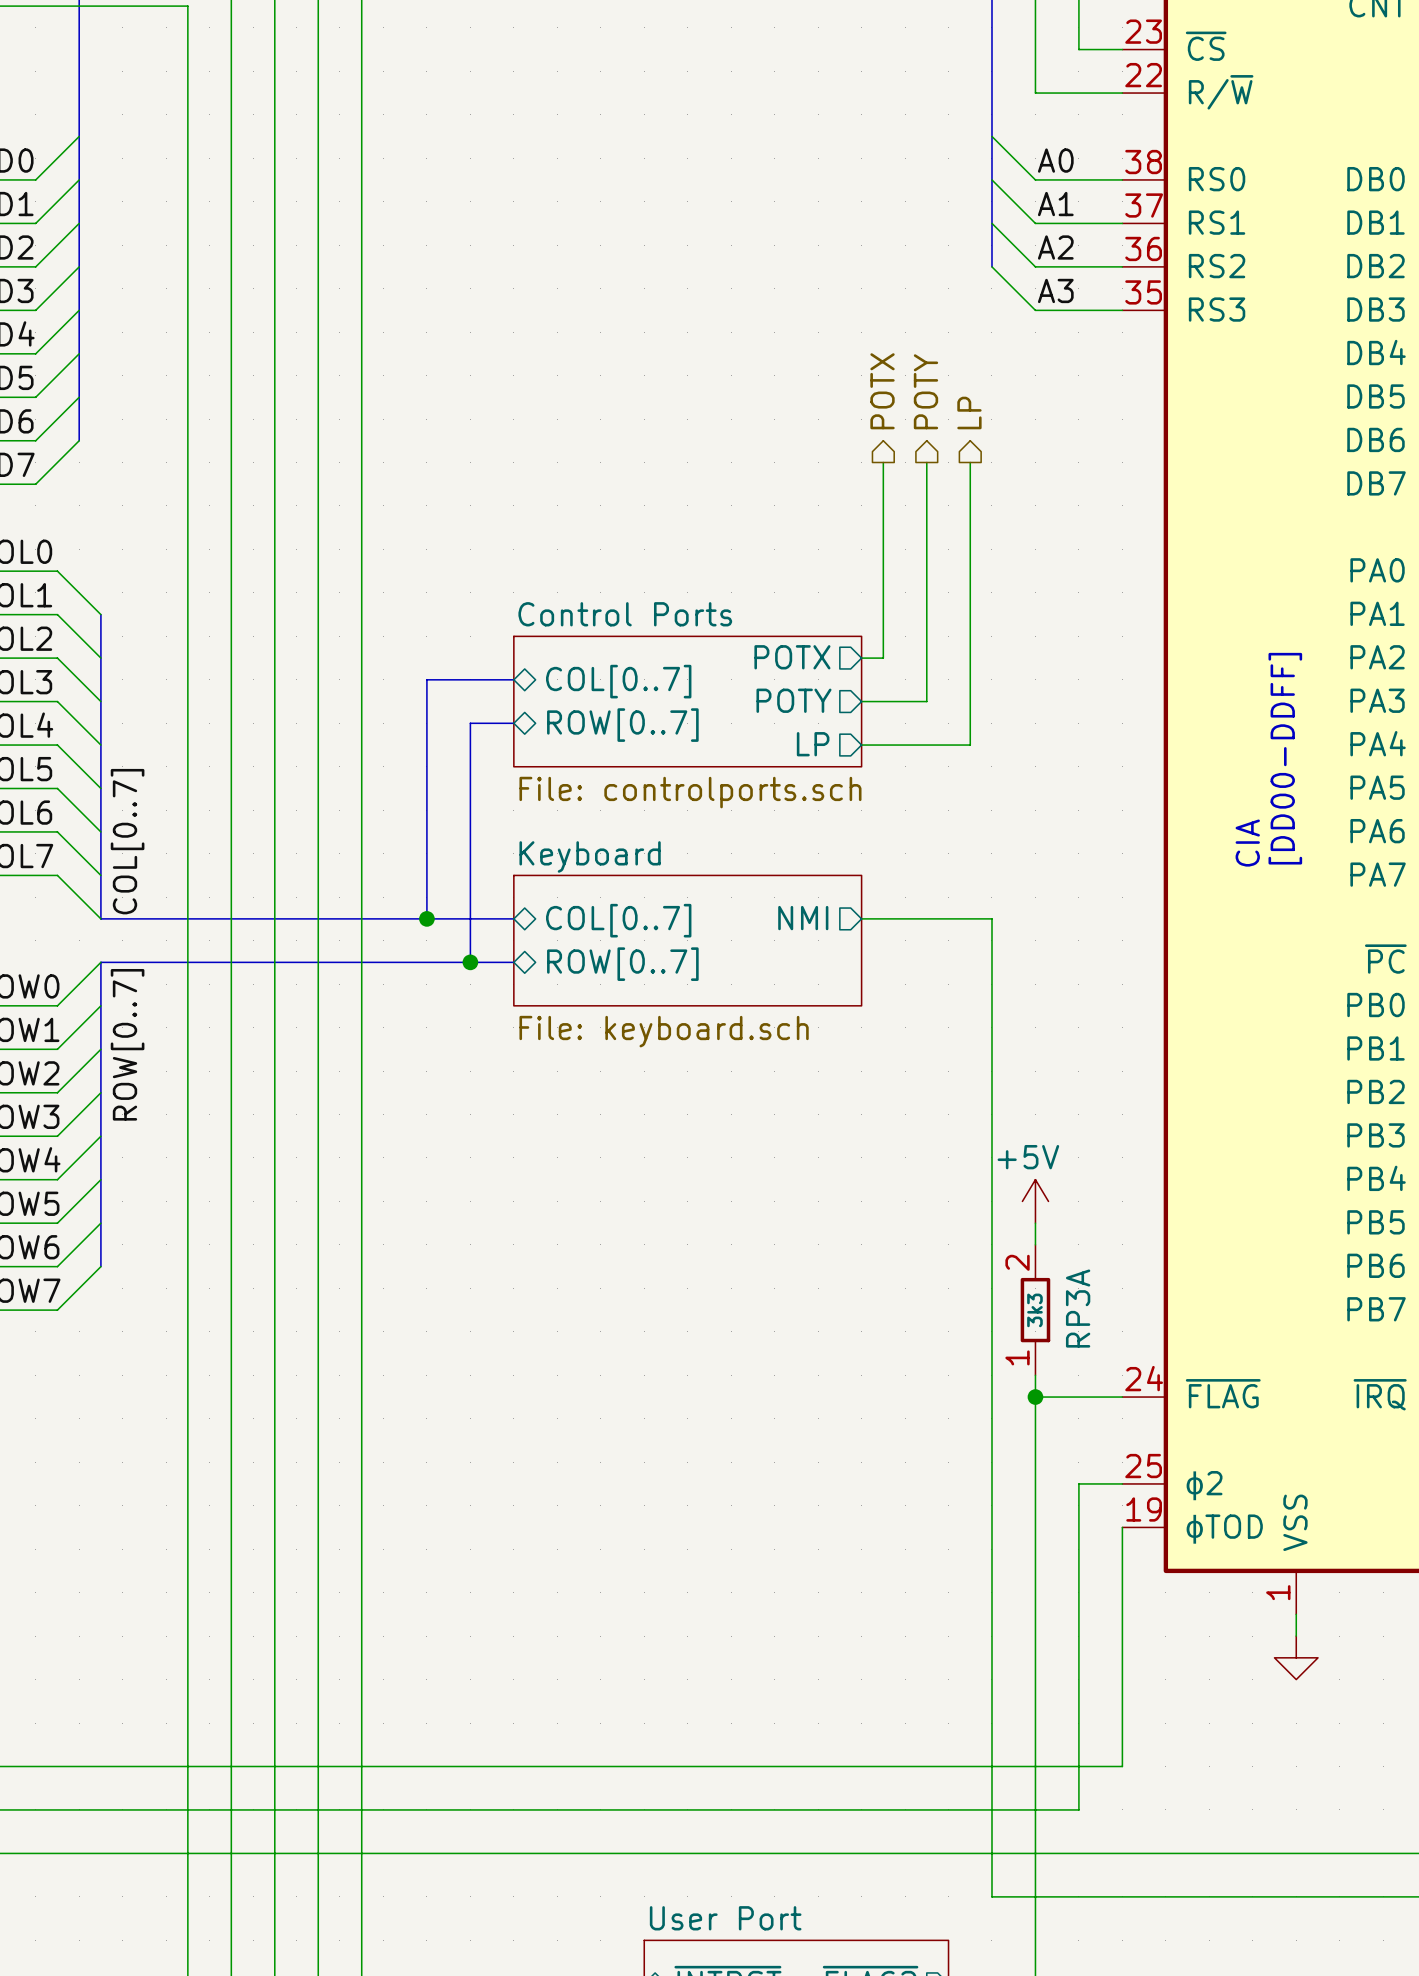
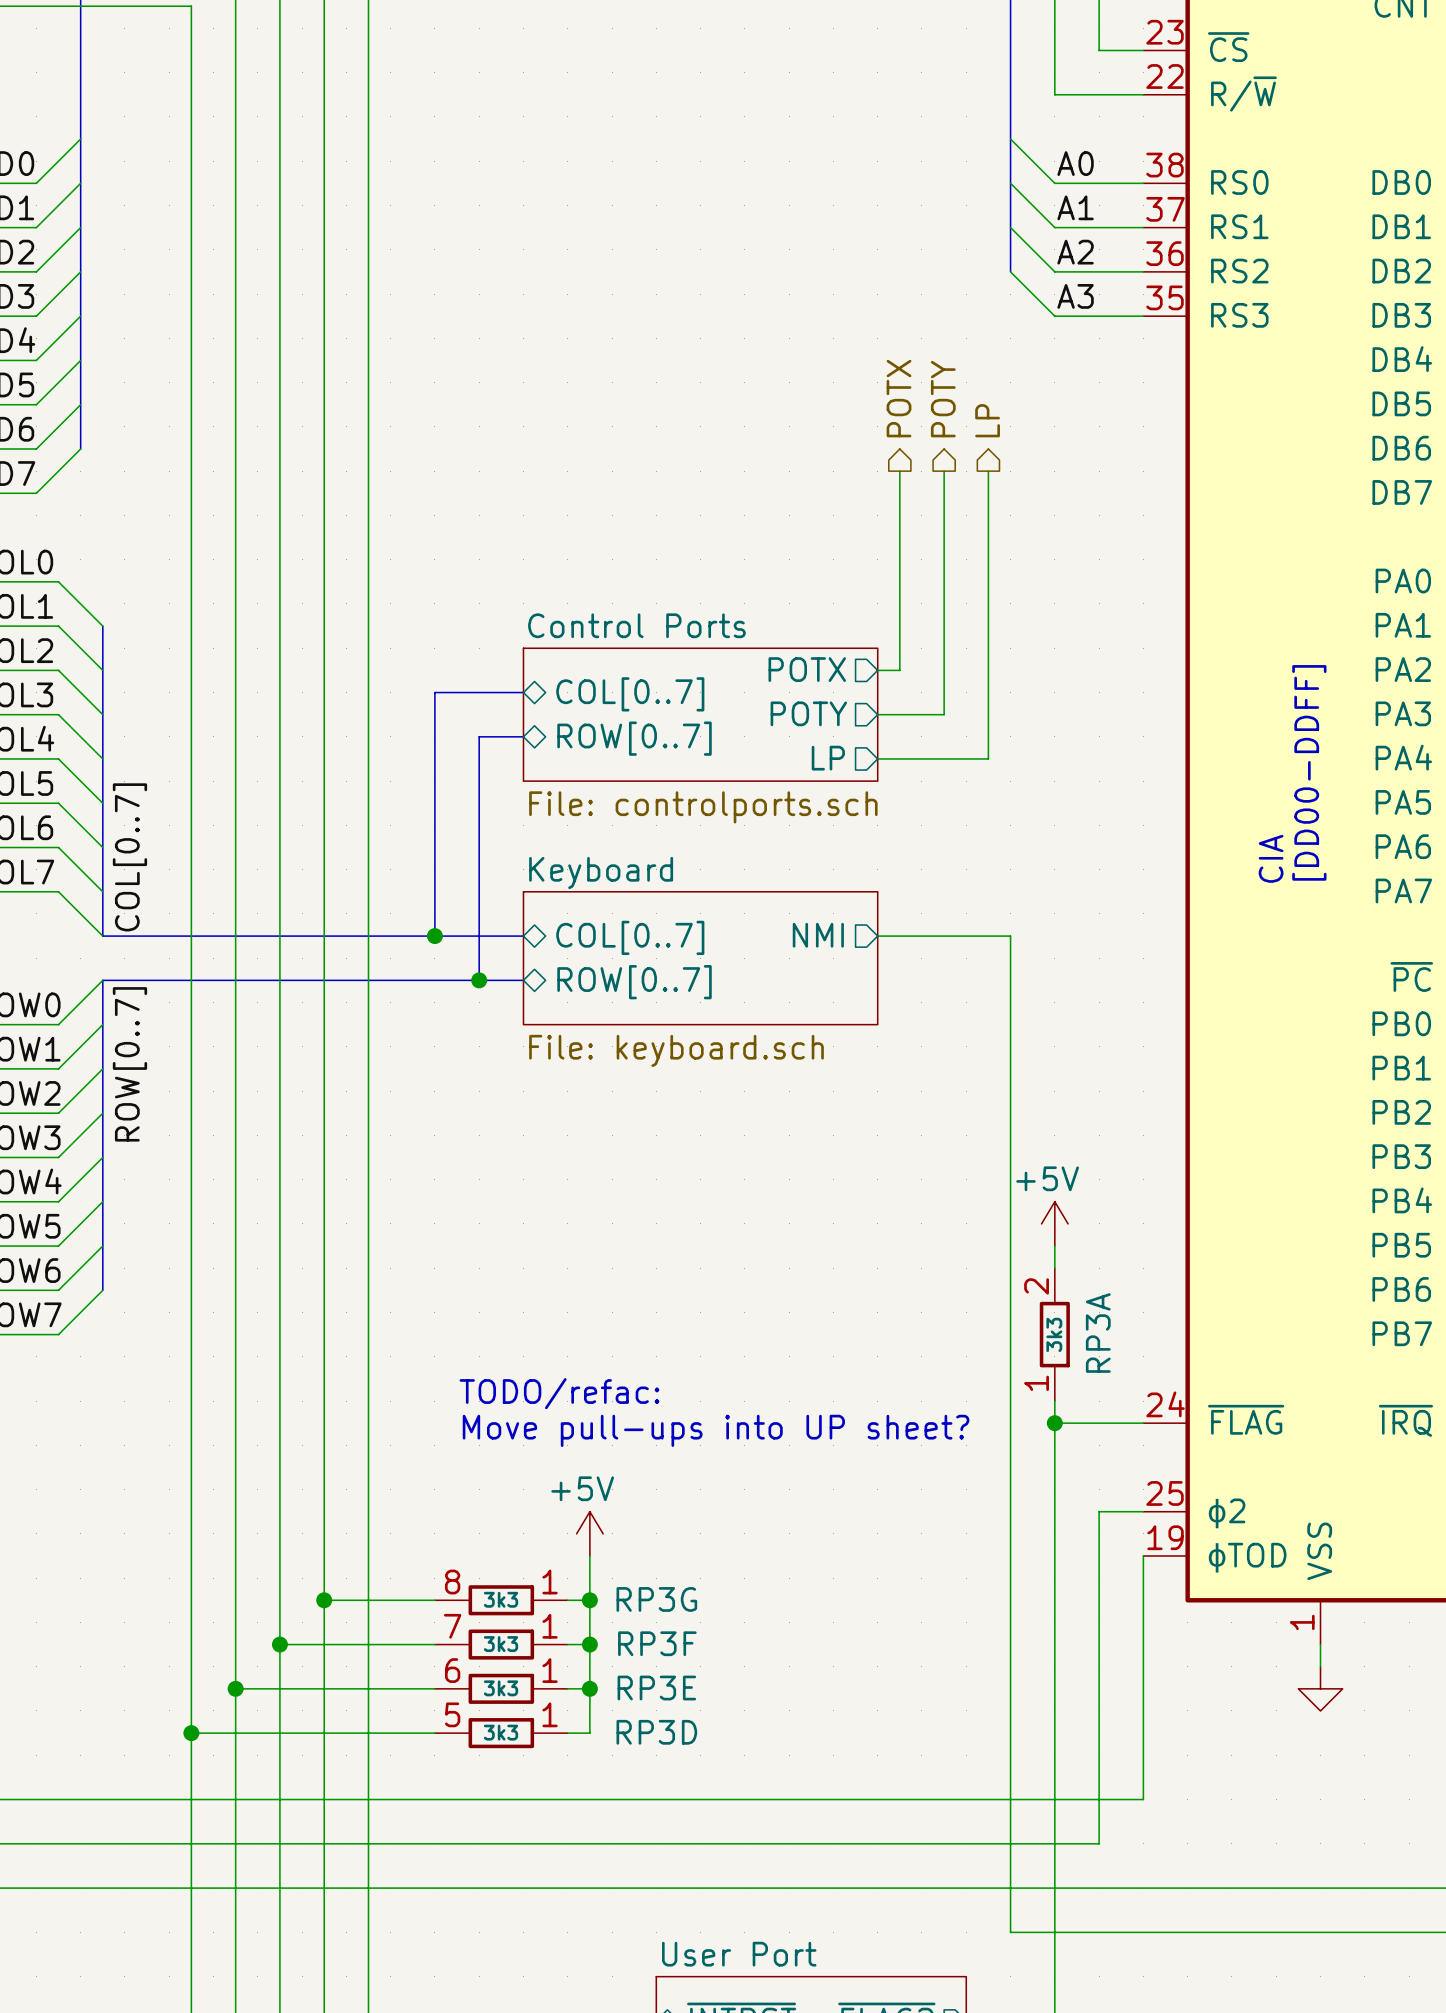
text: none -> TODO/refac: (559, 1393)
text: none -> Move pull-ups into UP sheet? (716, 1430)
power symbol: none -> +5V (589, 1533)
wire: none -> (589, 1556) (589, 1733) (567, 1733)
wire: none -> (324, 1600) (434, 1600)
junction: none -> (324, 1600)
RP3G: none -> 3k3 (501, 1600)
wire: none -> (567, 1600) (589, 1600)
junction: none -> (589, 1600)
wire: none -> (279, 1644) (434, 1644)
junction: none -> (279, 1644)
RP3F: none -> 3k3 (501, 1644)
wire: none -> (567, 1644) (589, 1644)
junction: none -> (589, 1644)
wire: none -> (235, 1688) (434, 1688)
junction: none -> (235, 1688)
RP3E: none -> 3k3 (501, 1688)
wire: none -> (567, 1688) (589, 1688)
junction: none -> (589, 1688)
wire: none -> (191, 1733) (434, 1733)
junction: none -> (191, 1733)
RP3D: none -> 3k3 (501, 1733)

